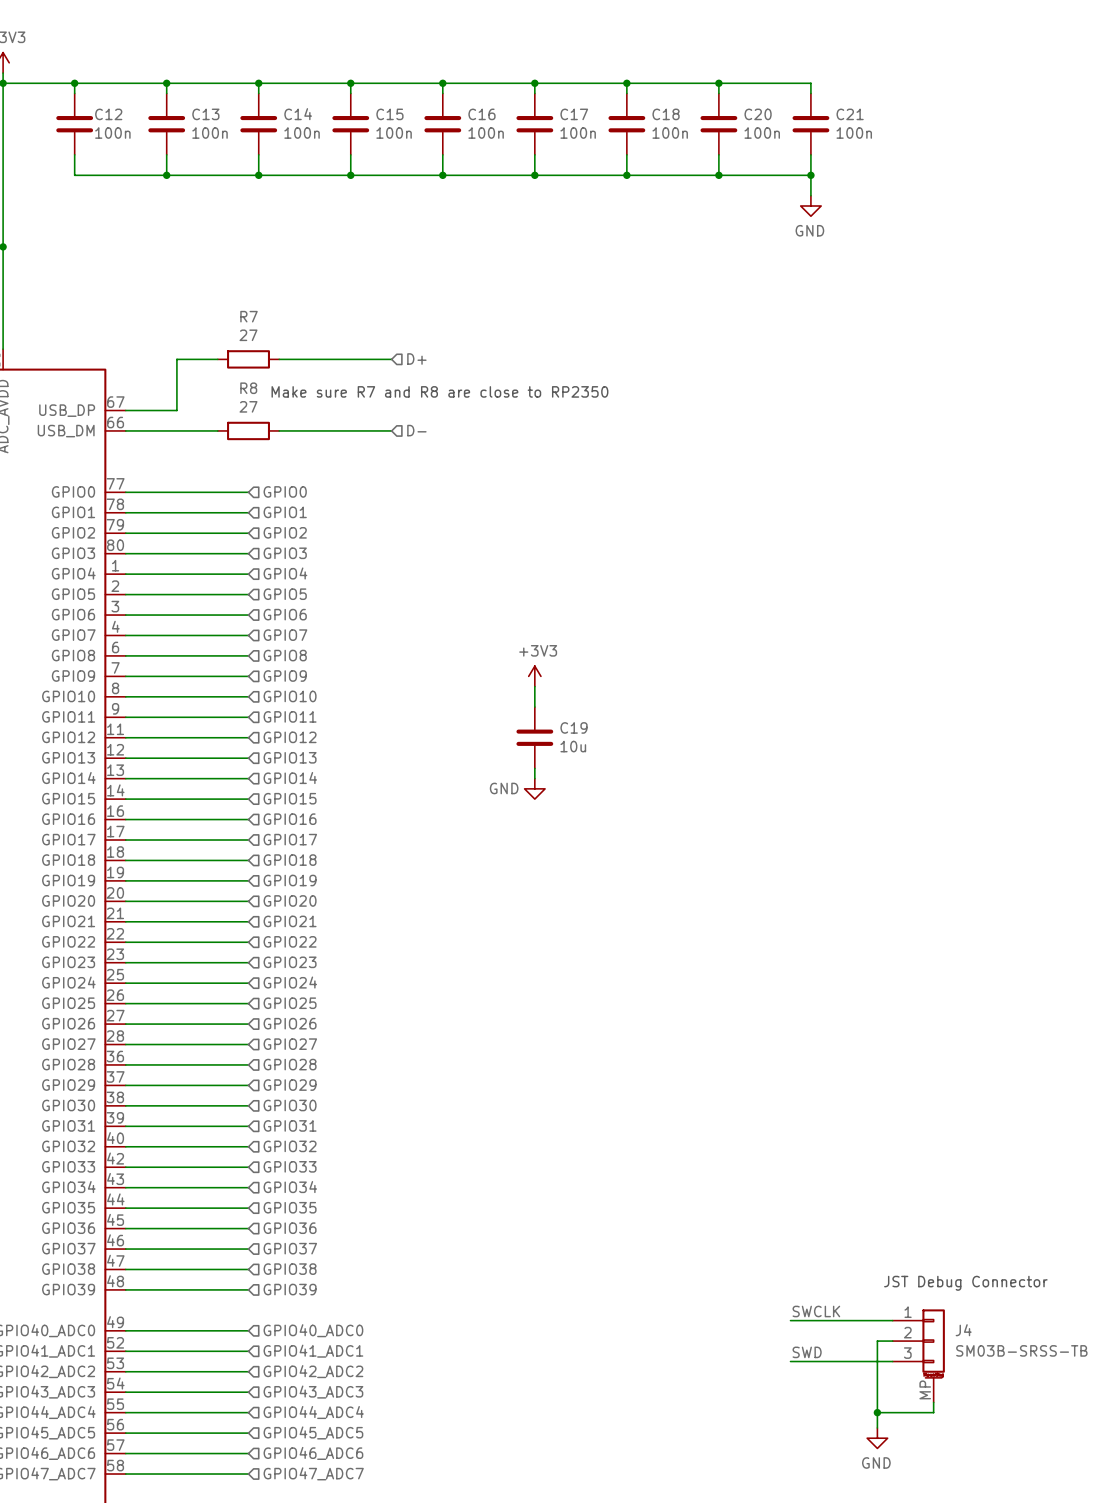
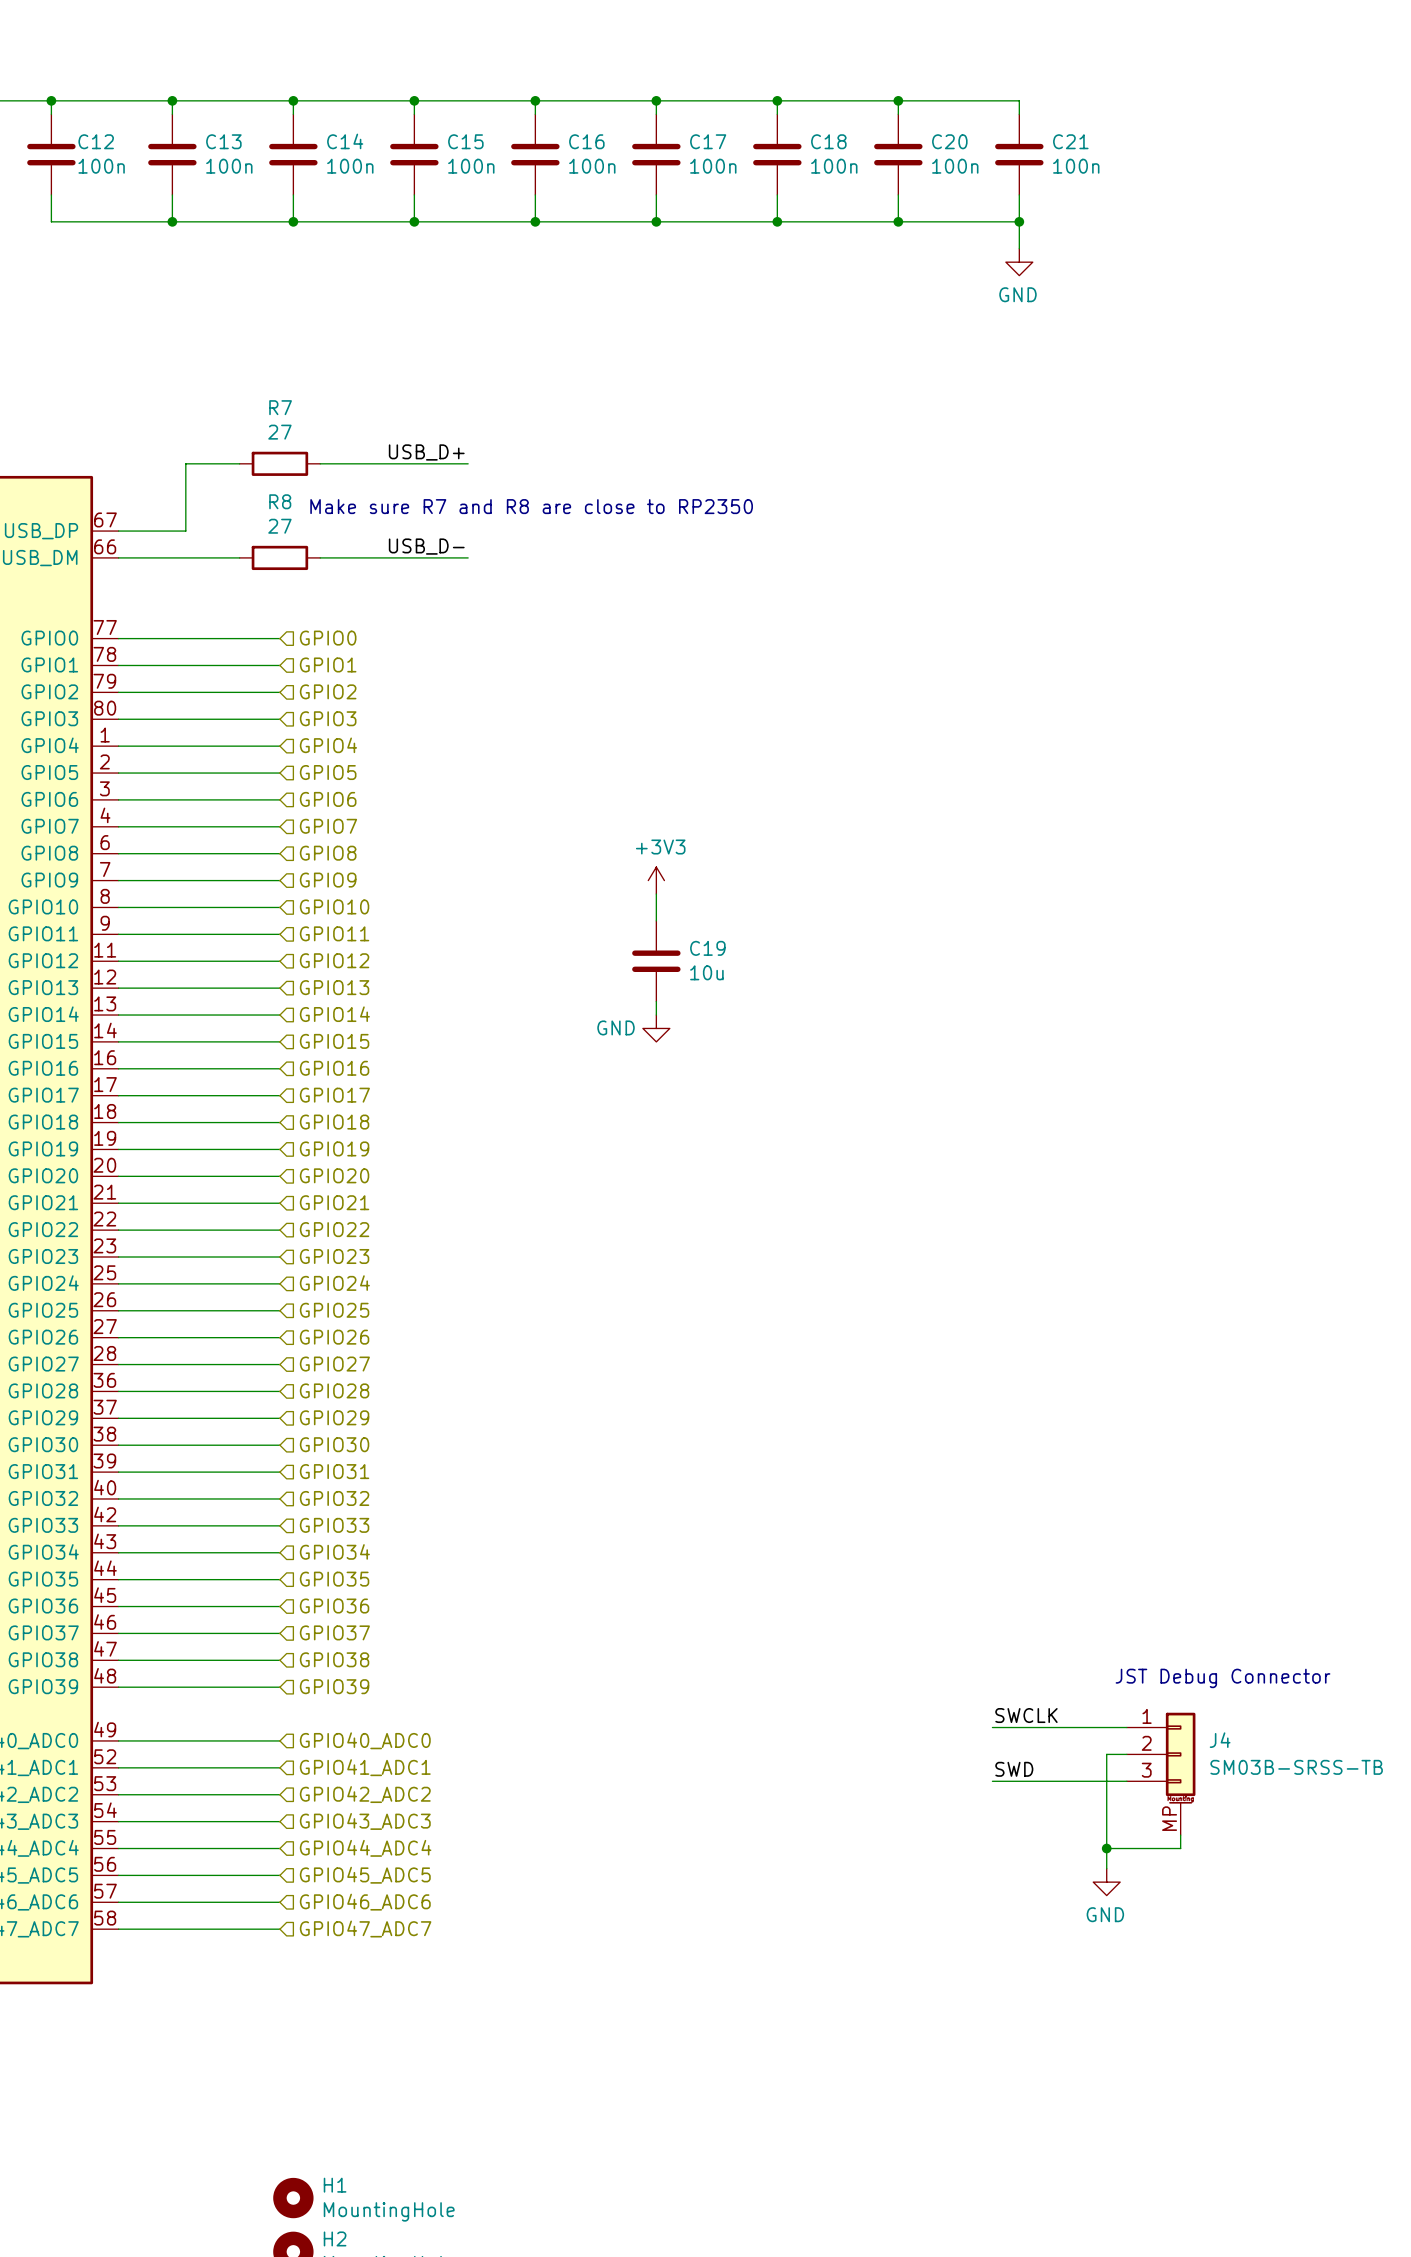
label: none -> USB_D+ (426, 452)
hierarchical label: D+ (416, 359) -> none
label: none -> USB_D- (426, 546)
hierarchical label: D- (416, 430) -> none

